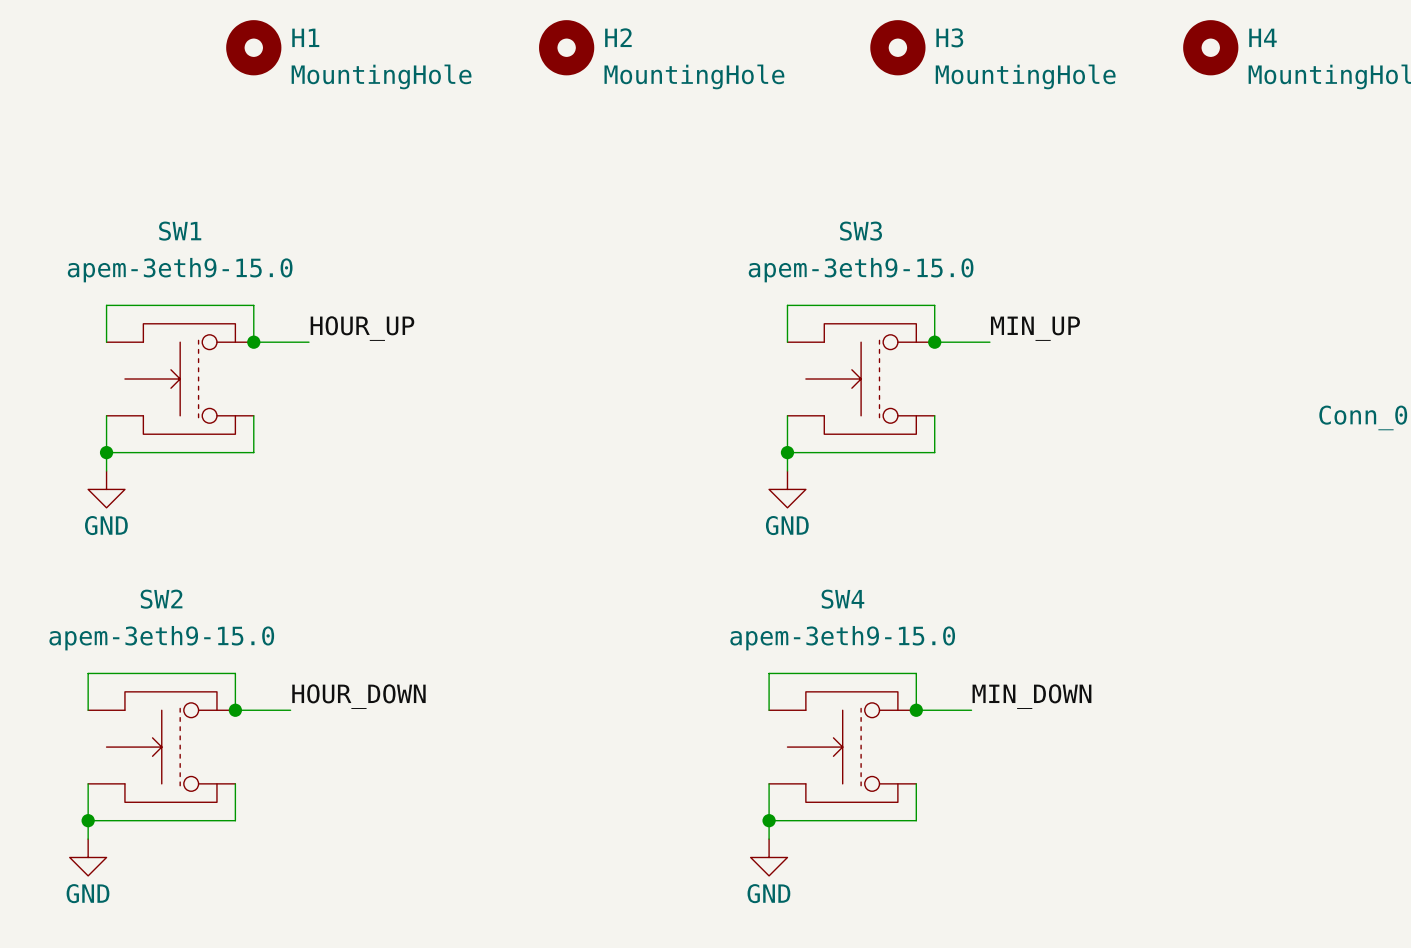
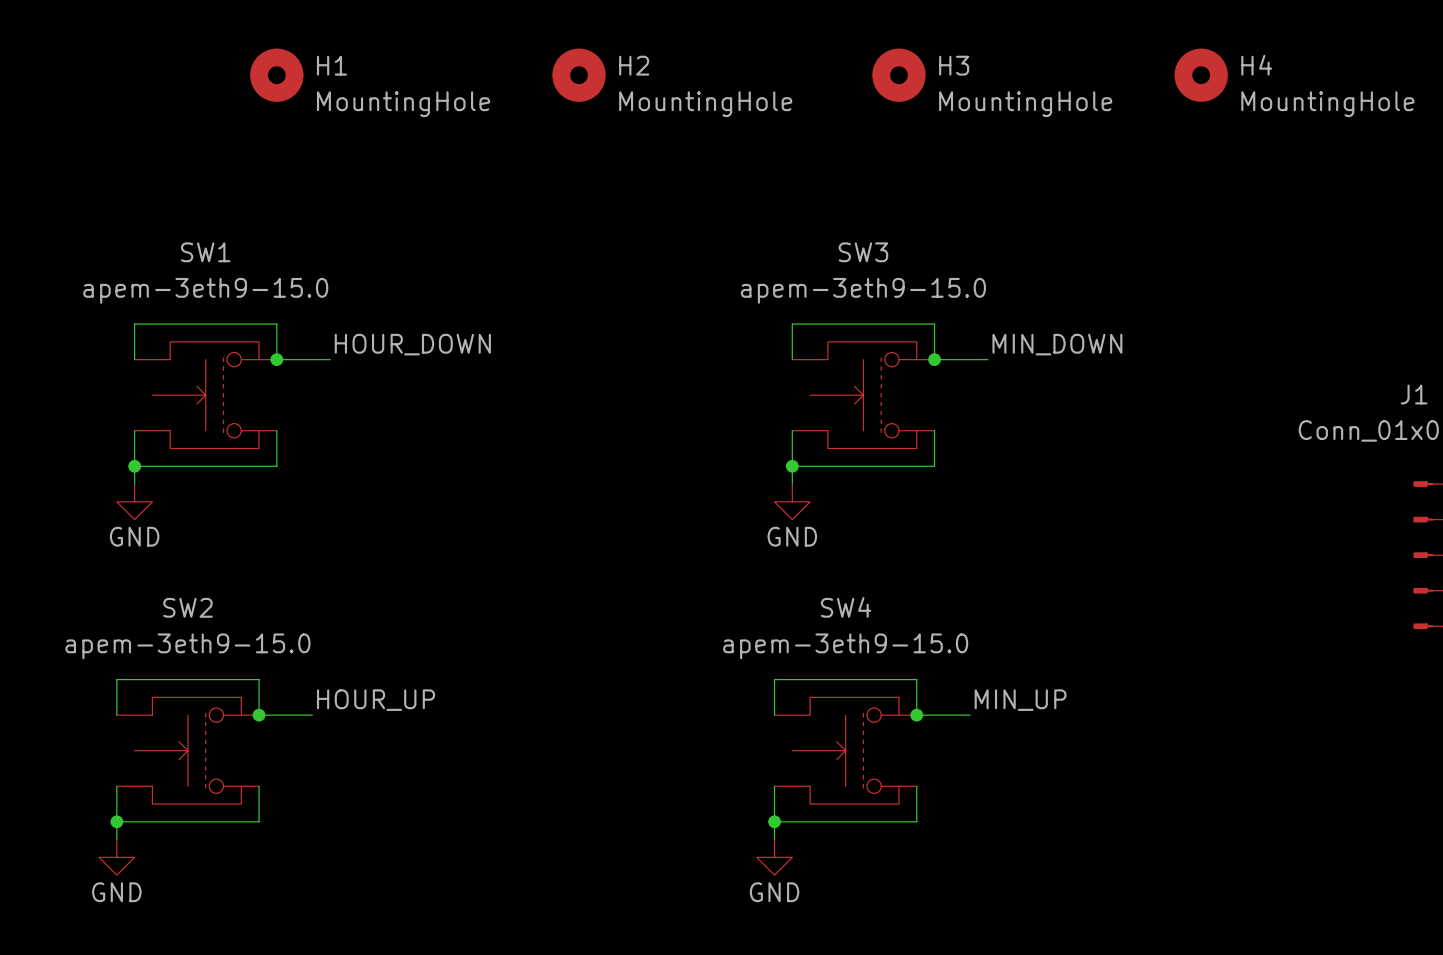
label: HOUR_UP (362, 328) -> HOUR_DOWN (412, 344)
label: MIN_UP (1035, 328) -> MIN_DOWN (1057, 344)
label: HOUR_DOWN (358, 696) -> HOUR_UP (376, 700)
label: MIN_DOWN (1031, 696) -> MIN_UP (1020, 700)

